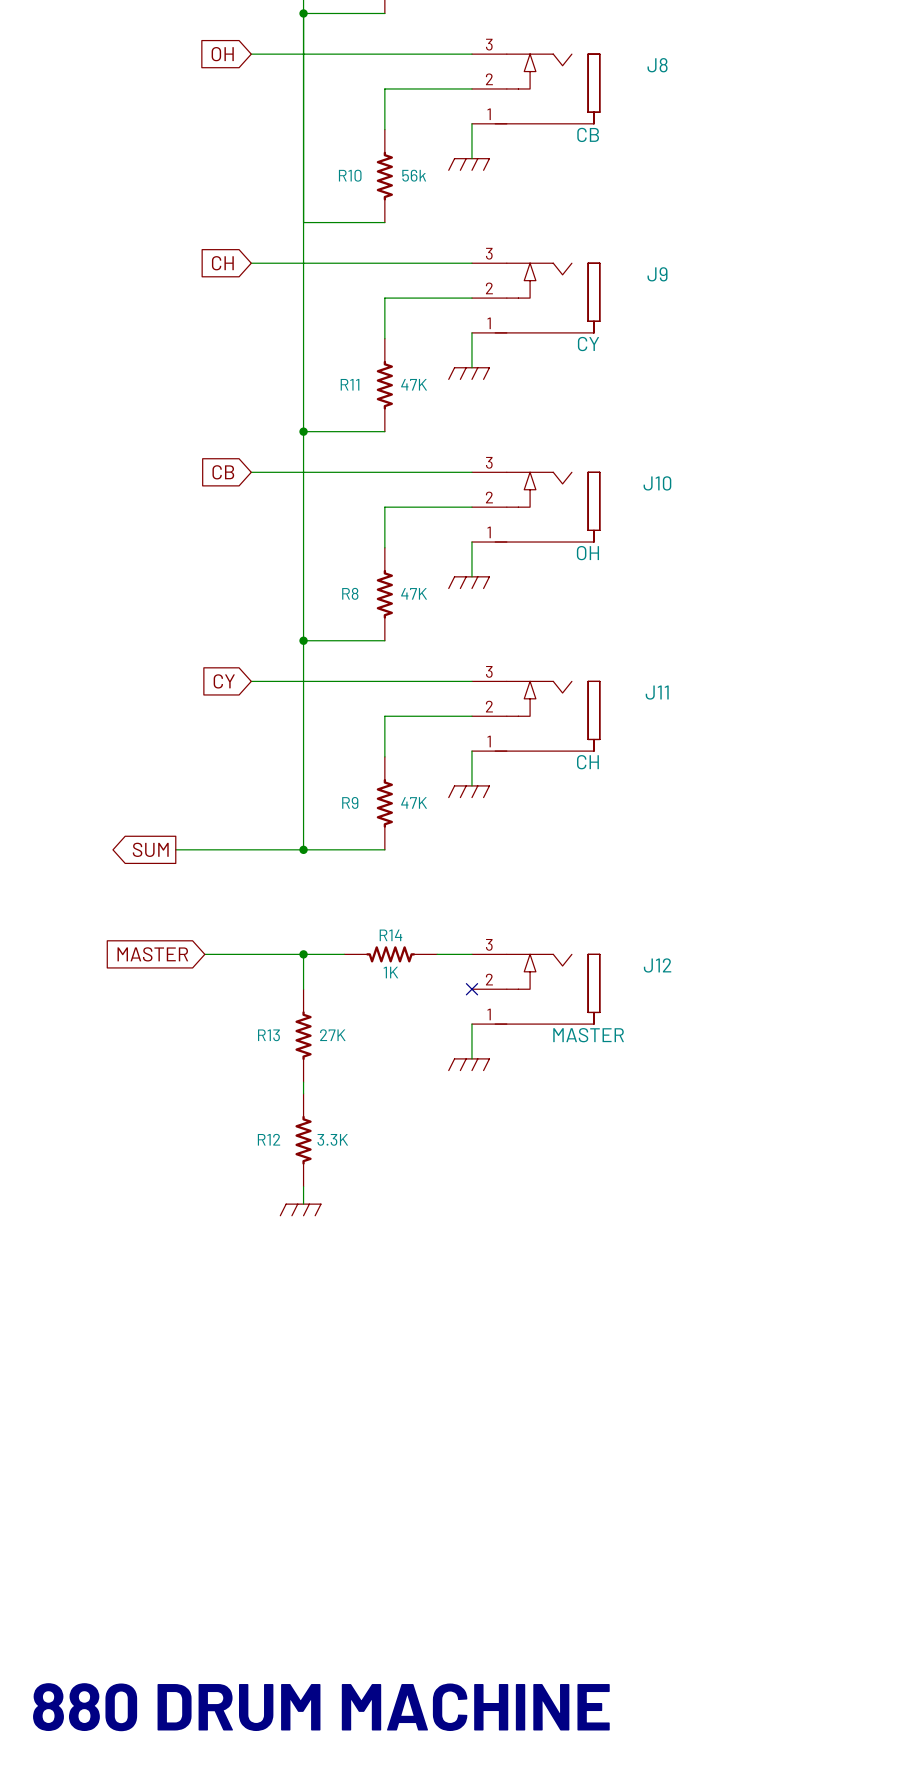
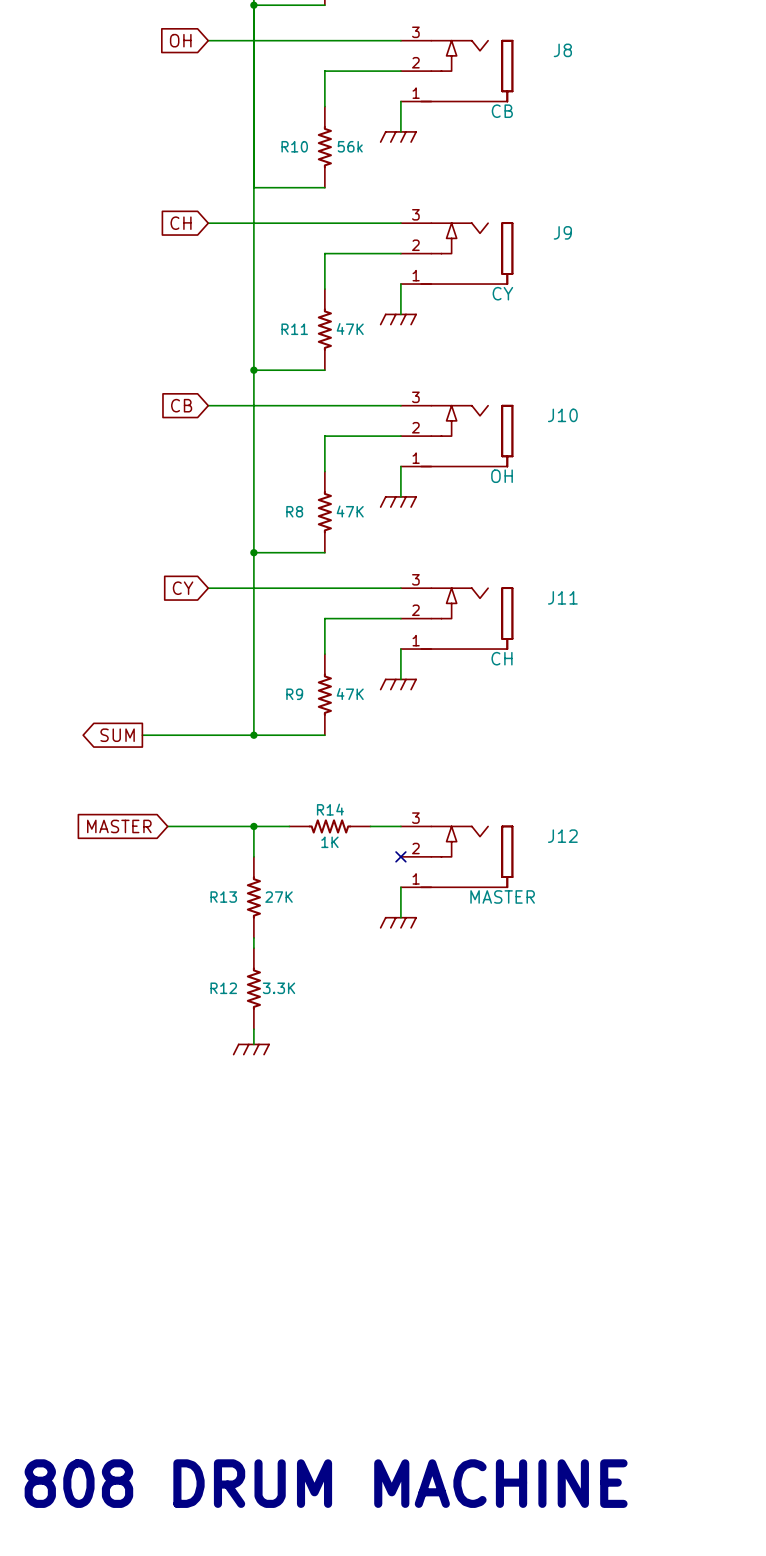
text: 880 DRUM MACHINE (321, 1707) -> 808 DRUM MACHINE (326, 1483)

